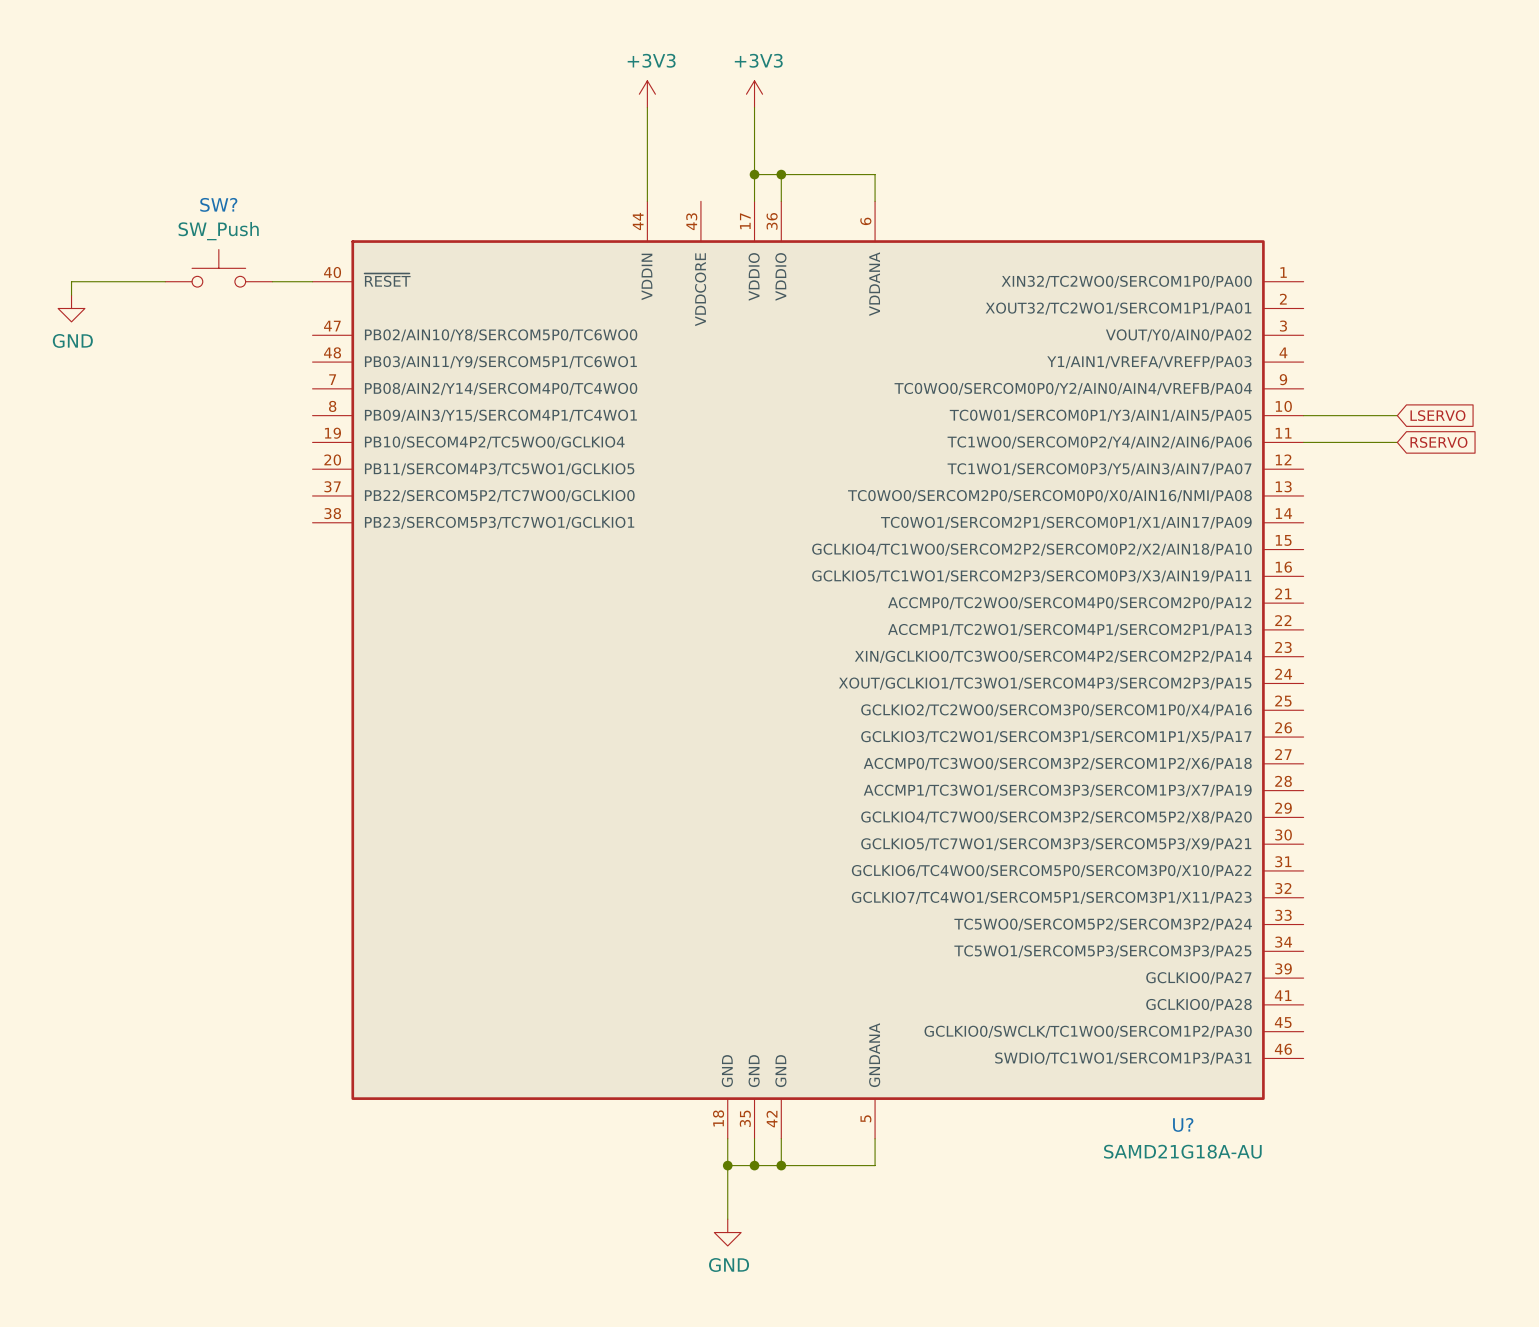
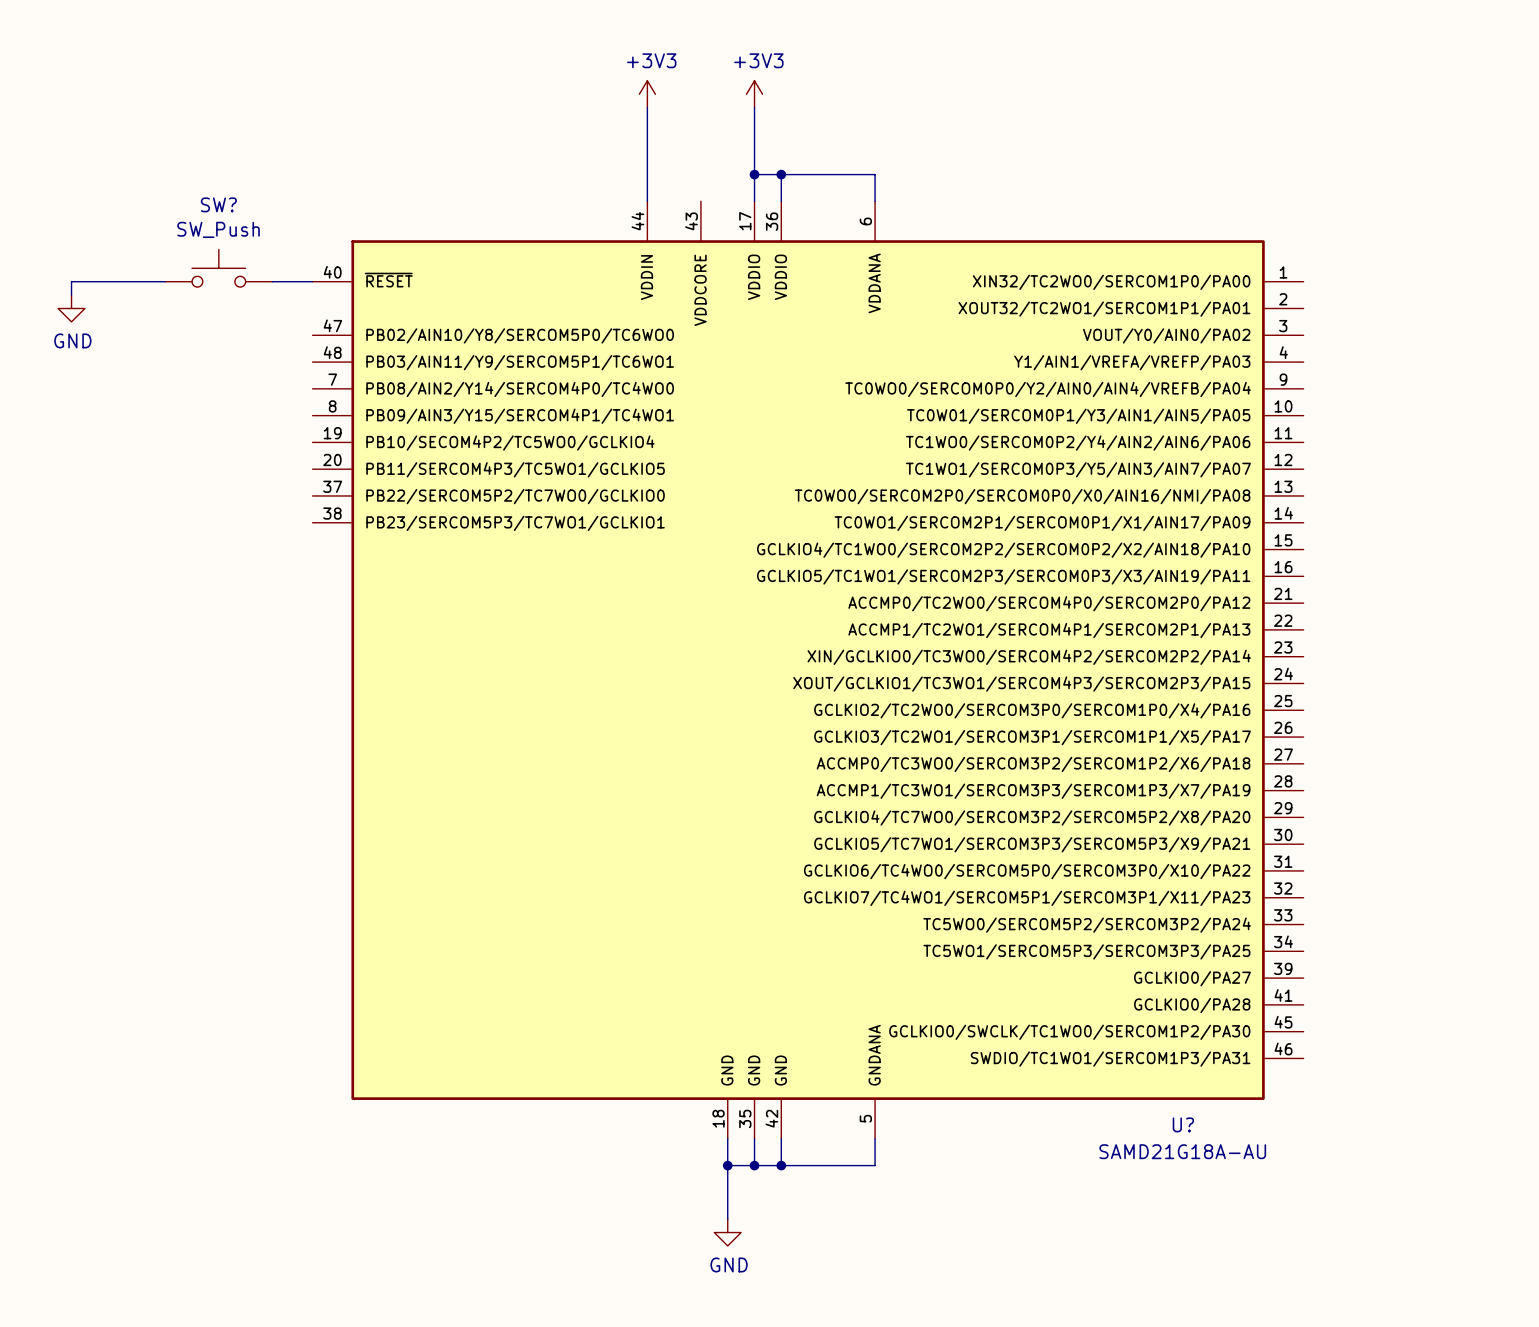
wire: (1303, 415) (1397, 415) -> none
global label: LSERVO (1437, 415) -> none
wire: (1303, 442) (1397, 442) -> none
global label: RSERVO (1438, 442) -> none

